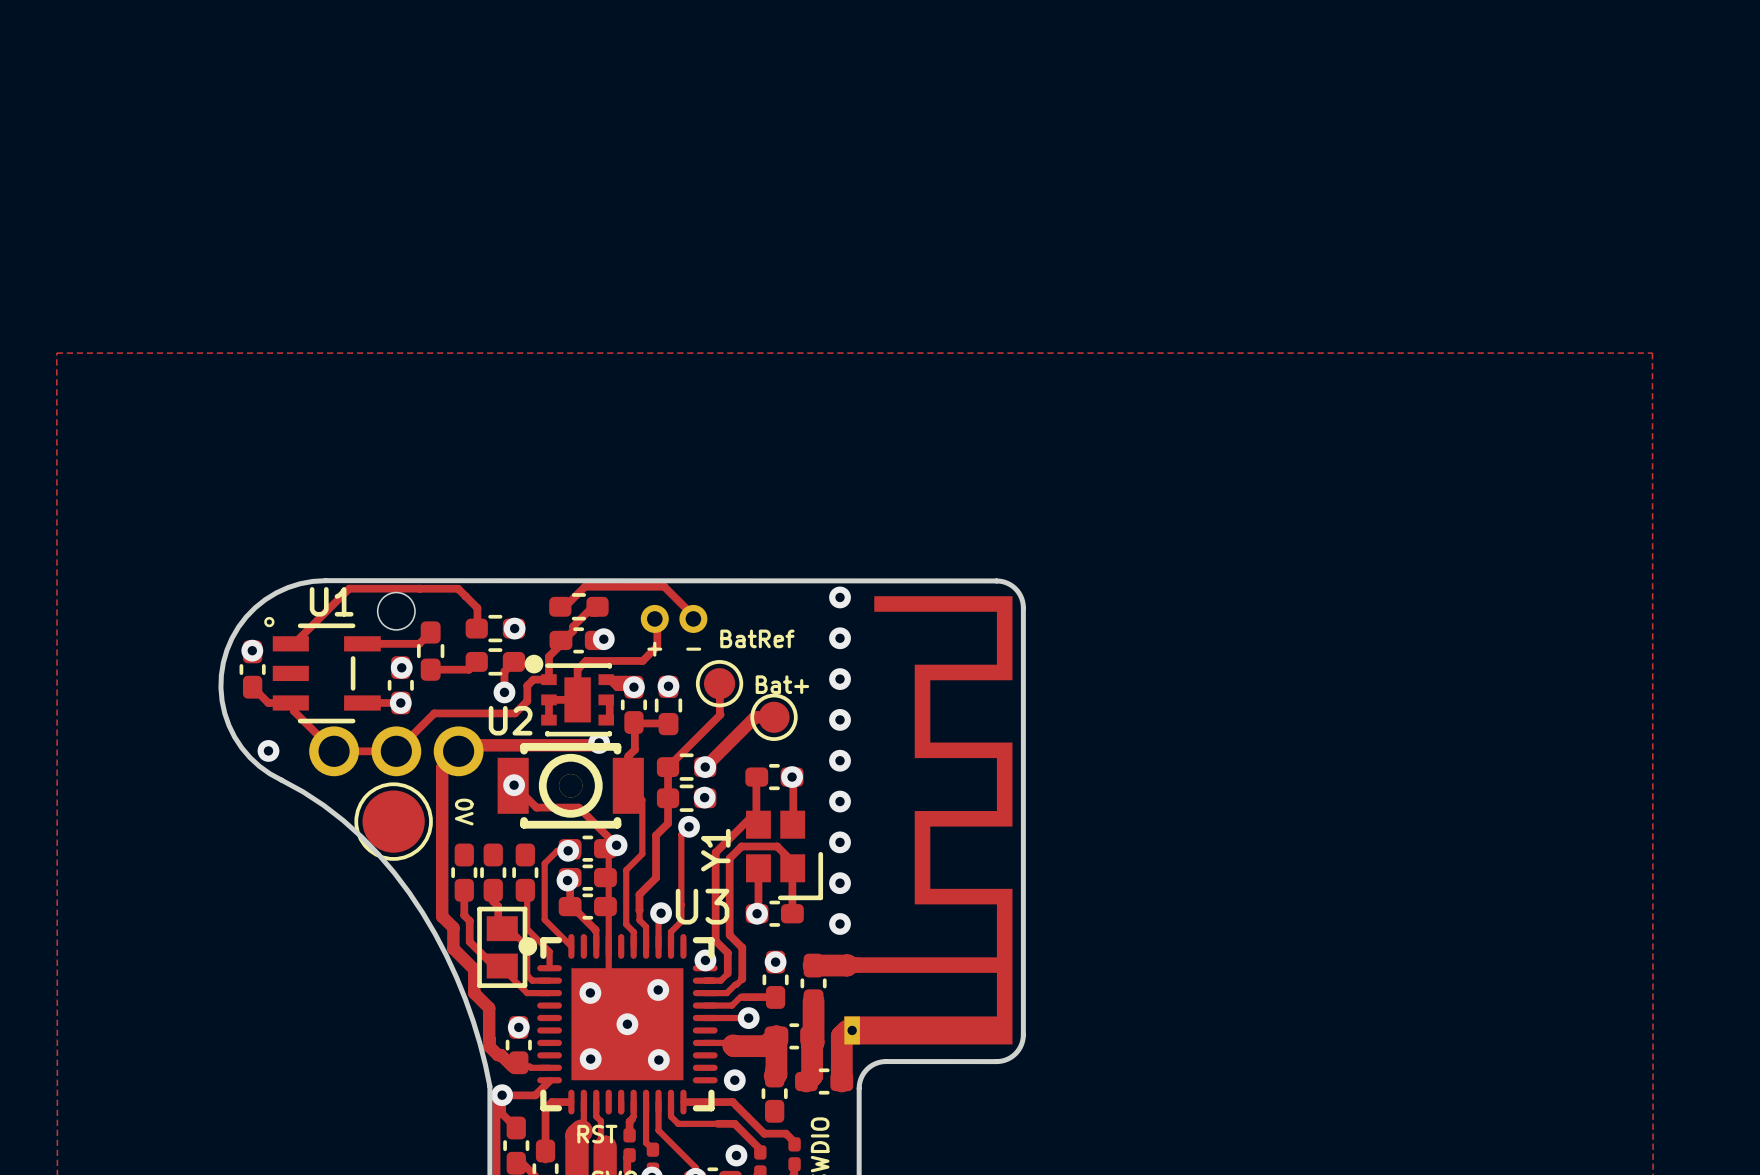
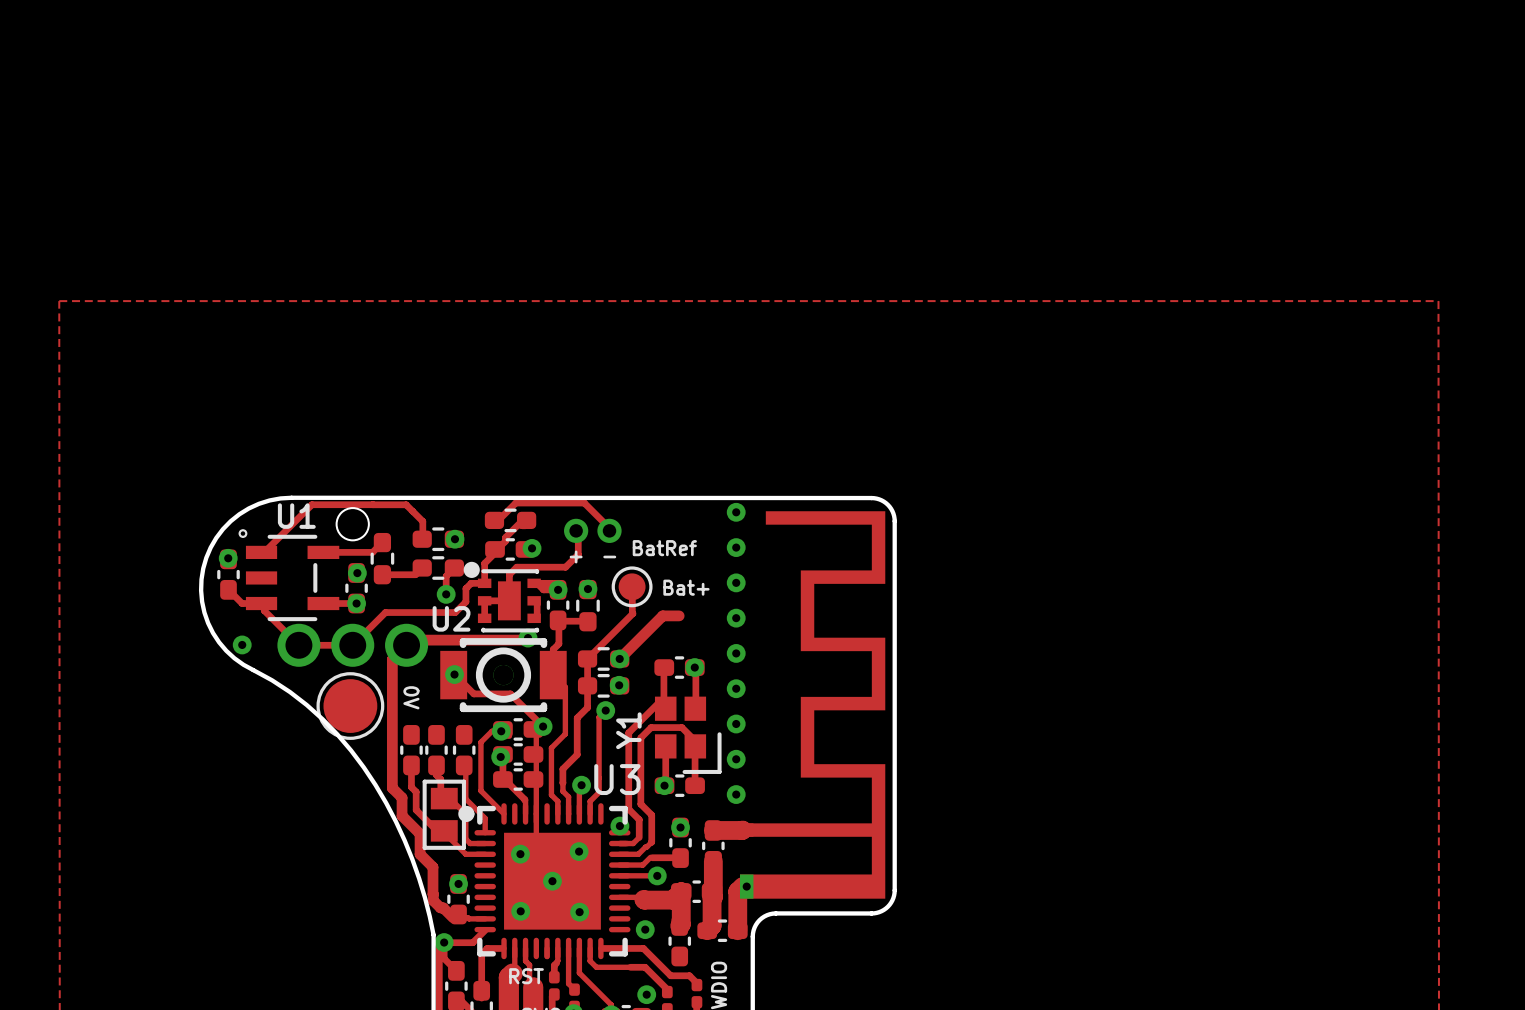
part: (774, 717) -> none

